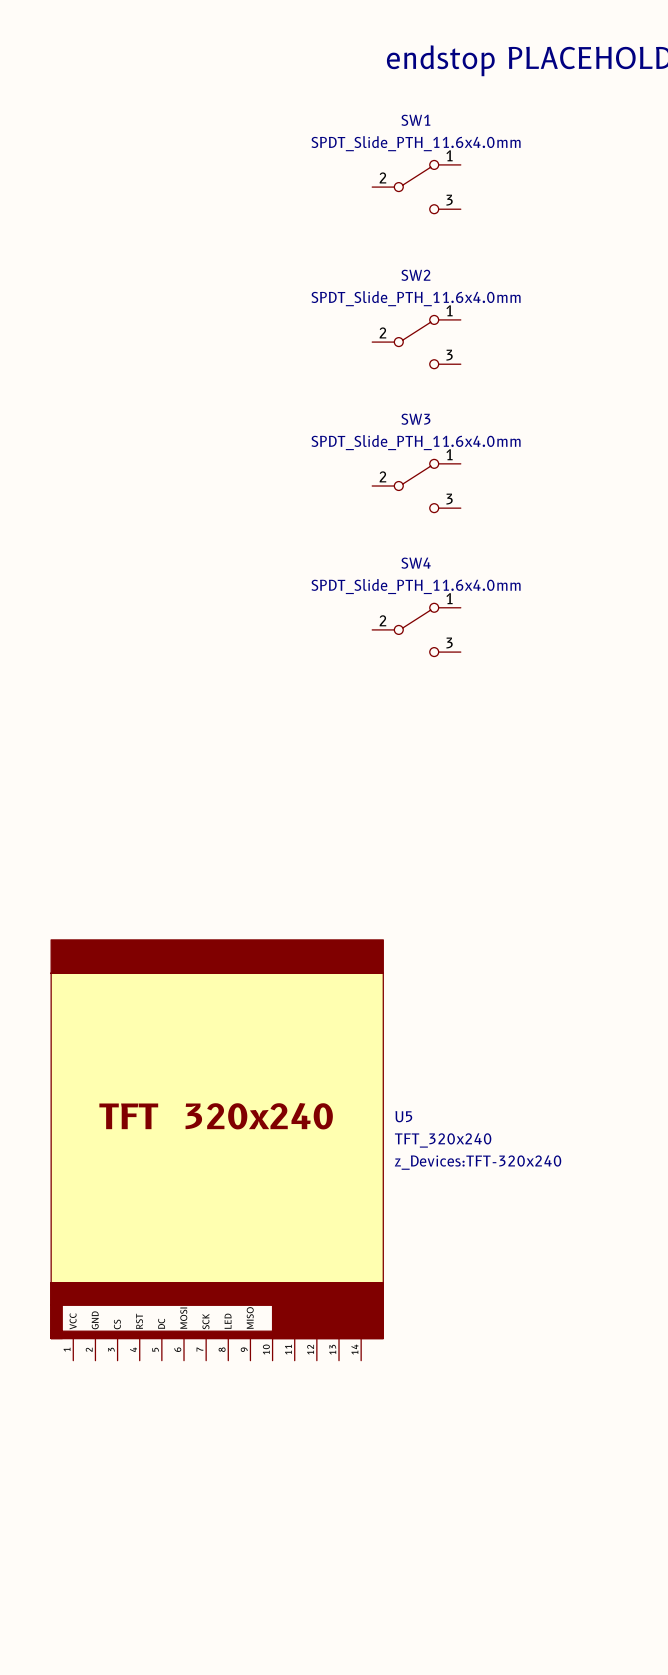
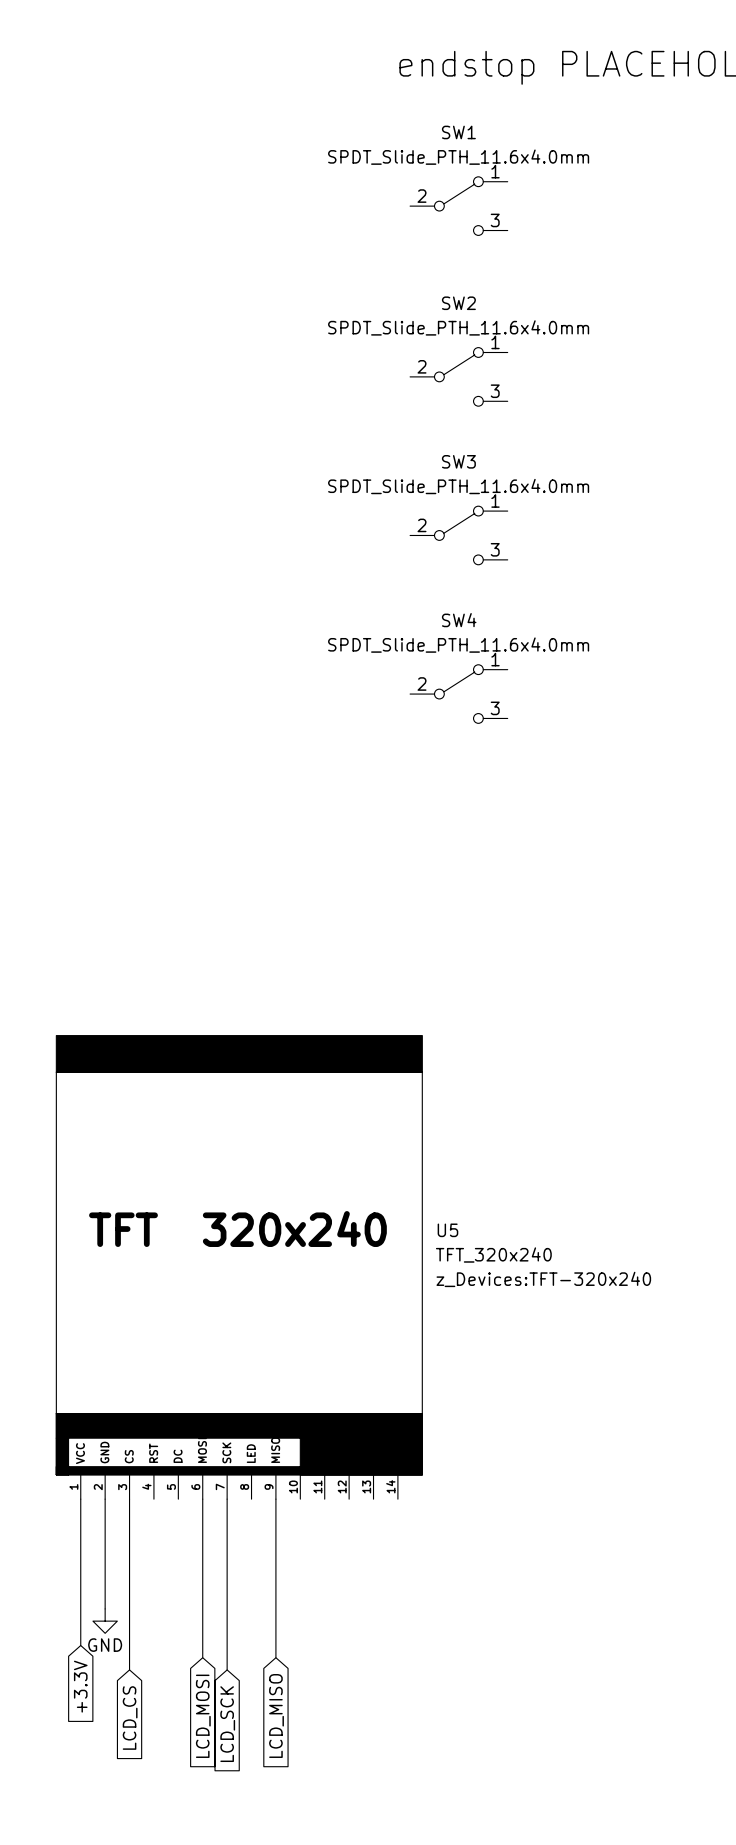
wire: none -> (80, 1499) (80, 1645)
wire: none -> (105, 1499) (105, 1608)
wire: none -> (129, 1499) (129, 1669)
wire: none -> (202, 1499) (202, 1657)
wire: none -> (227, 1499) (227, 1669)
wire: none -> (275, 1499) (275, 1657)
power symbol: none -> GND (105, 1621)
global label: none -> +3.3V (80, 1686)
global label: none -> LCD_MOSI (203, 1716)
global label: none -> LCD_MISO (276, 1715)
global label: none -> LCD_CS (130, 1718)
global label: none -> LCD_SCK (227, 1724)

